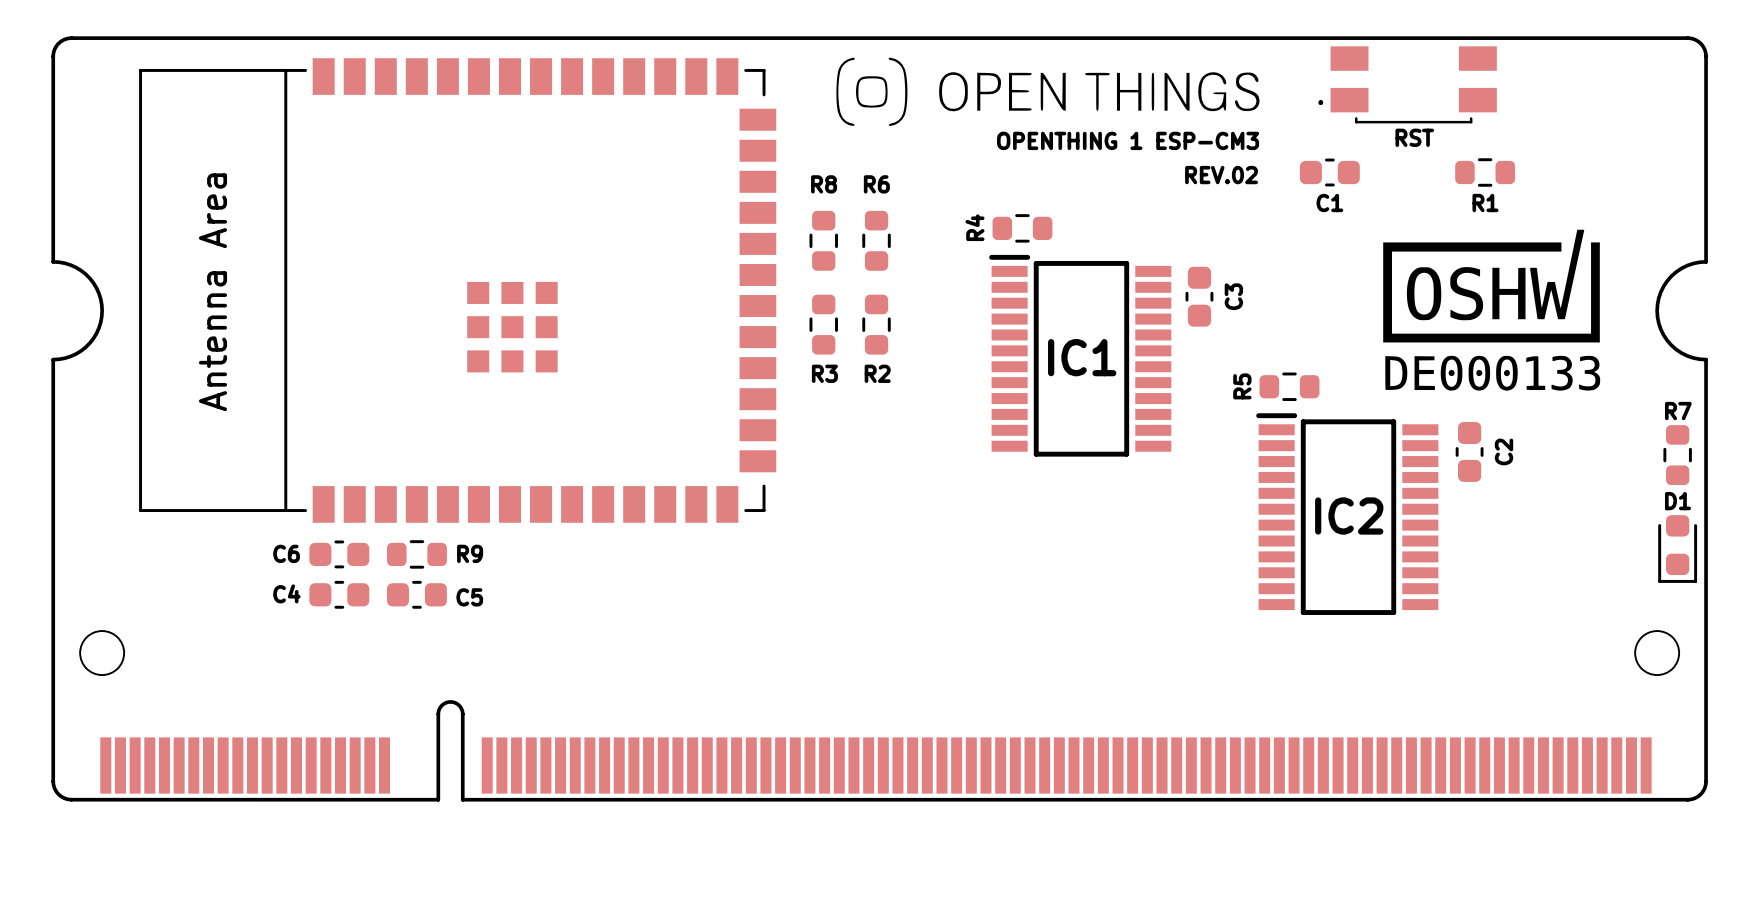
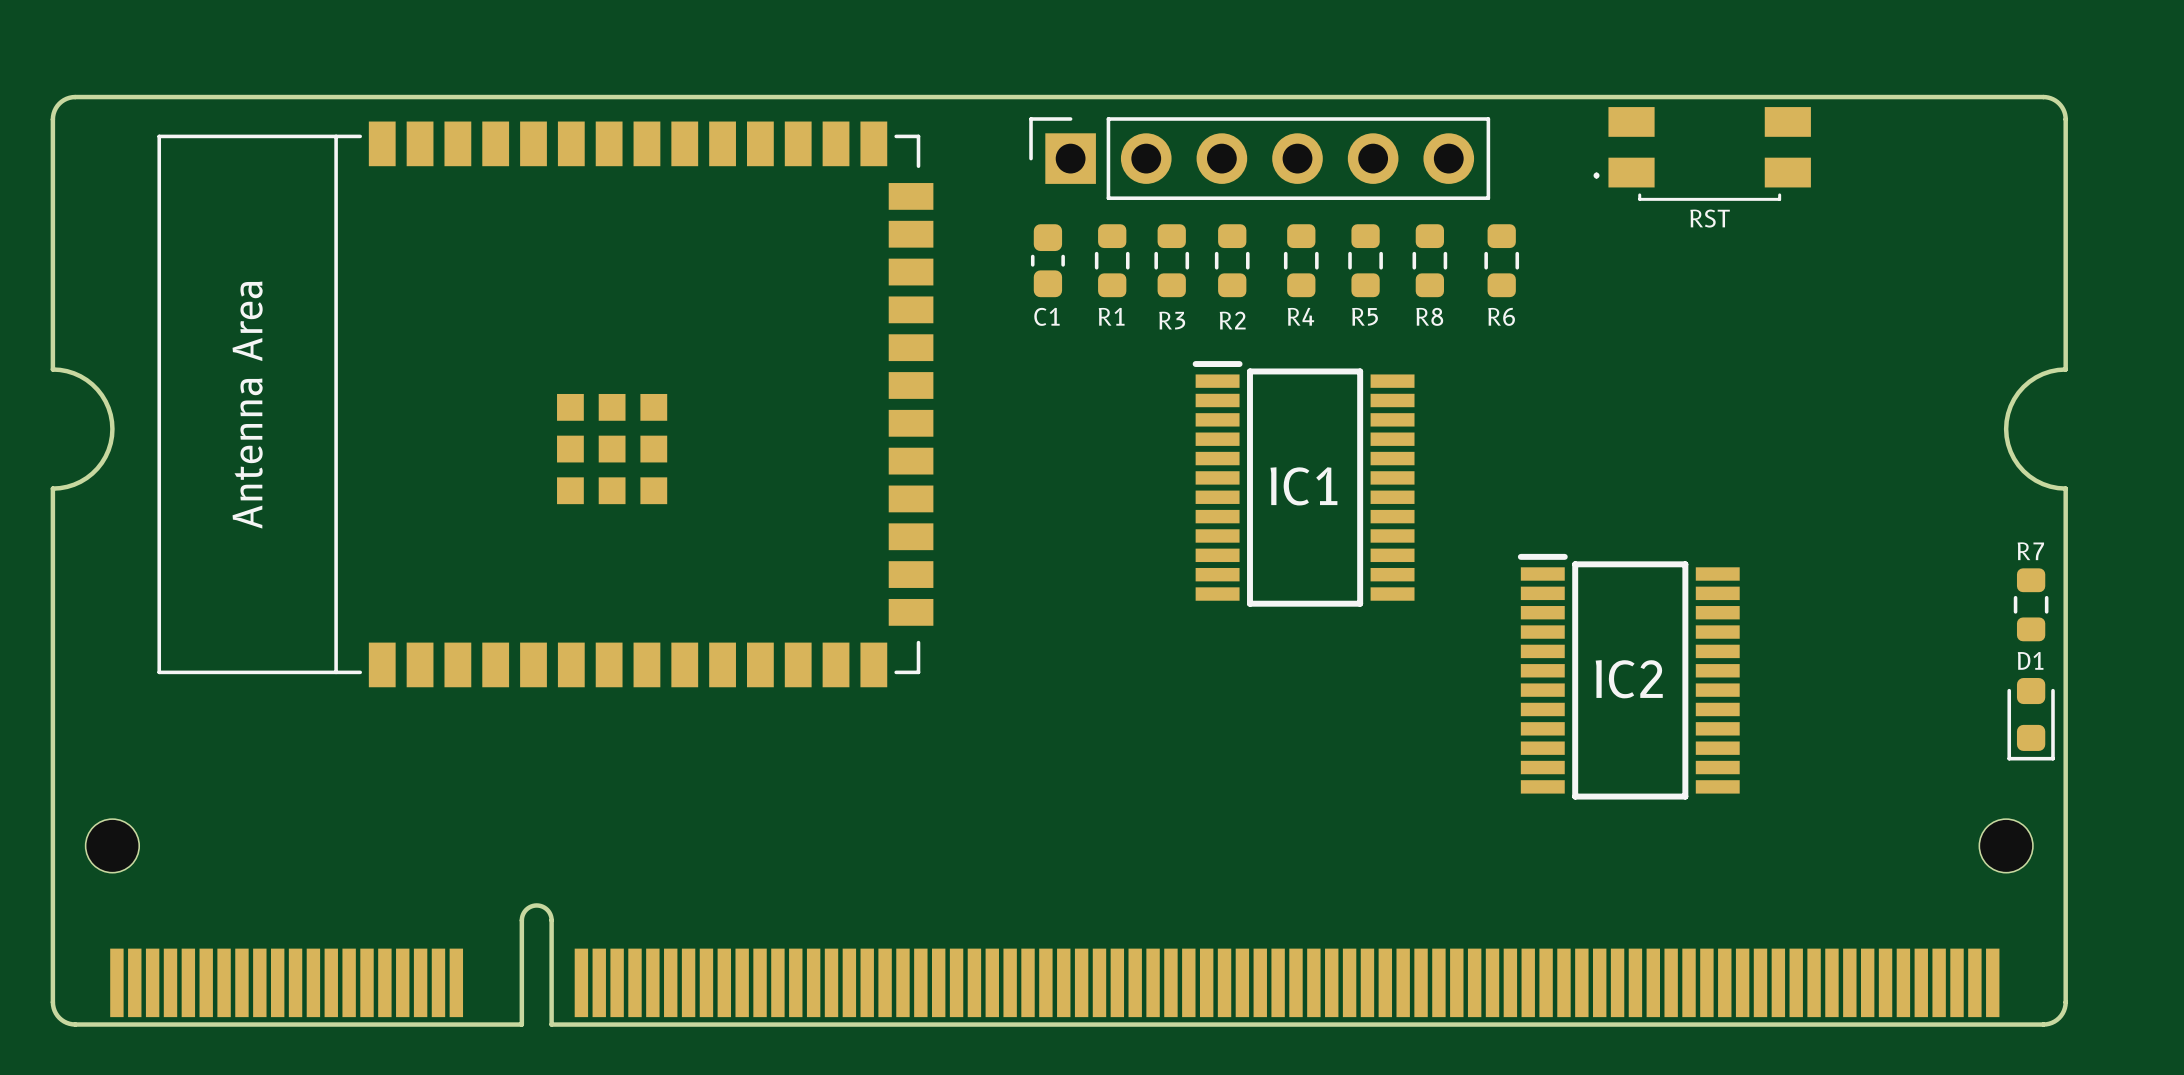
drawing: [836, 57, 1260, 126] -> none
part: none -> (1259, 158)
text: OPENTHING 1 ESP-CM3 (1128, 140) -> none
C1 rotation: 0° (1329, 172) -> 90° clockwise (1047, 260)
C1 position: (1329, 172) -> (1047, 260)
R1 rotation: 0° (1485, 172) -> 90° clockwise (1112, 260)
R1 position: (1485, 172) -> (1112, 260)
text: REV.02 (1221, 175) -> none
R8 name position: R8 (824, 184) -> R8 (1429, 316)
R6 name position: R6 (876, 184) -> R6 (1501, 316)
R4 name position: R4 (974, 227) -> R4 (1301, 316)
R4 rotation: 0° (1022, 228) -> 90° clockwise (1301, 260)
R4 position: (1022, 228) -> (1301, 260)
drawing: [1383, 229, 1601, 391] -> none
R8 position: (823, 240) -> (1429, 260)
R6 position: (876, 240) -> (1501, 260)
C3: (1199, 296) -> none
R3 position: (823, 324) -> (1171, 260)
R2 position: (876, 324) -> (1232, 260)
R5 name position: R5 (1242, 386) -> R5 (1365, 316)
R5 rotation: 0° (1289, 386) -> 90° clockwise (1365, 260)
R5 position: (1289, 386) -> (1365, 260)
C2: (1469, 451) -> none
C6: (339, 554) -> none
R9: (416, 554) -> none
C4: (339, 594) -> none
C5: (416, 594) -> none

